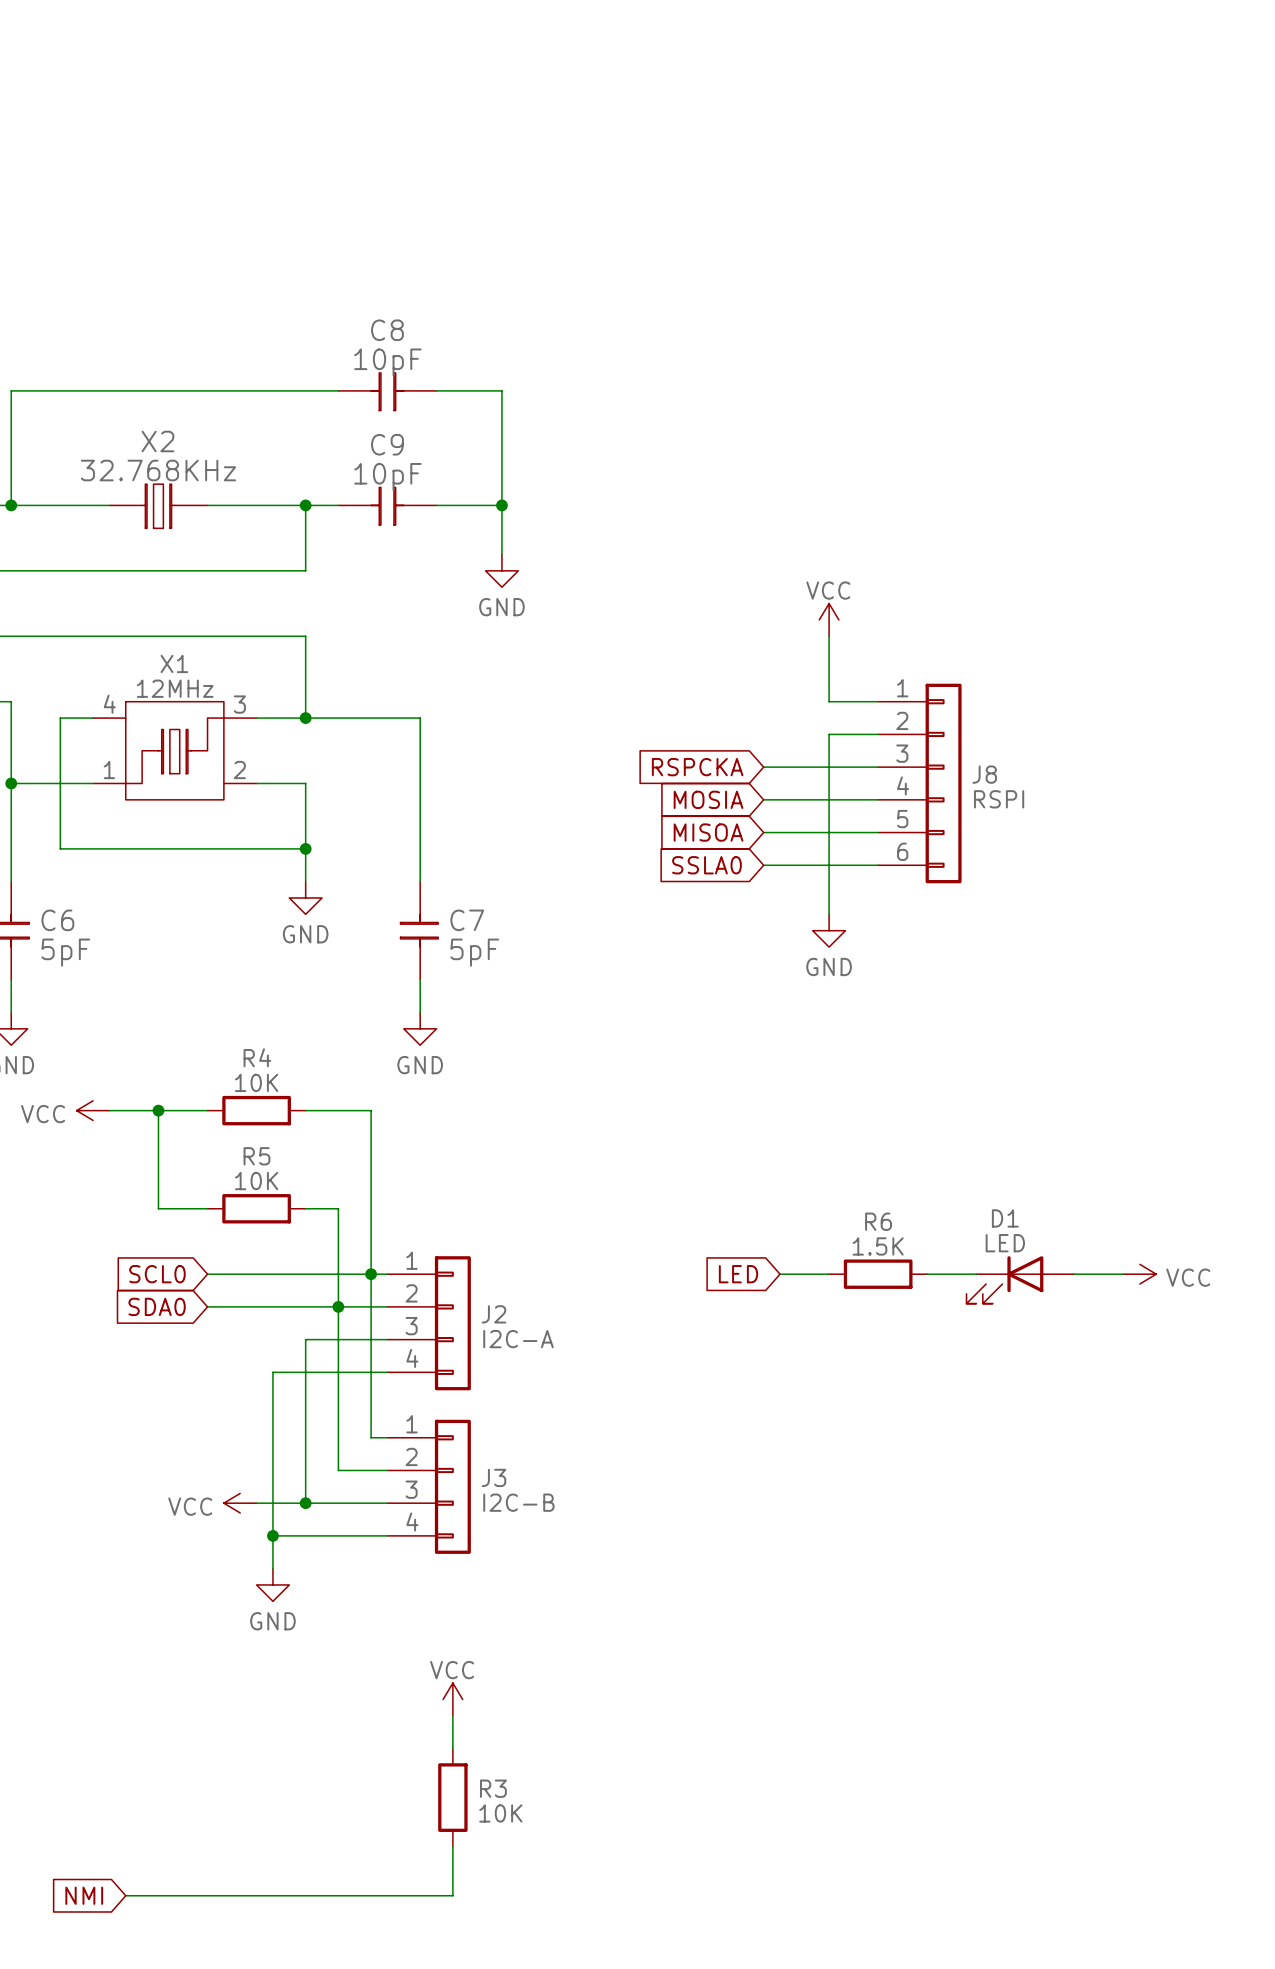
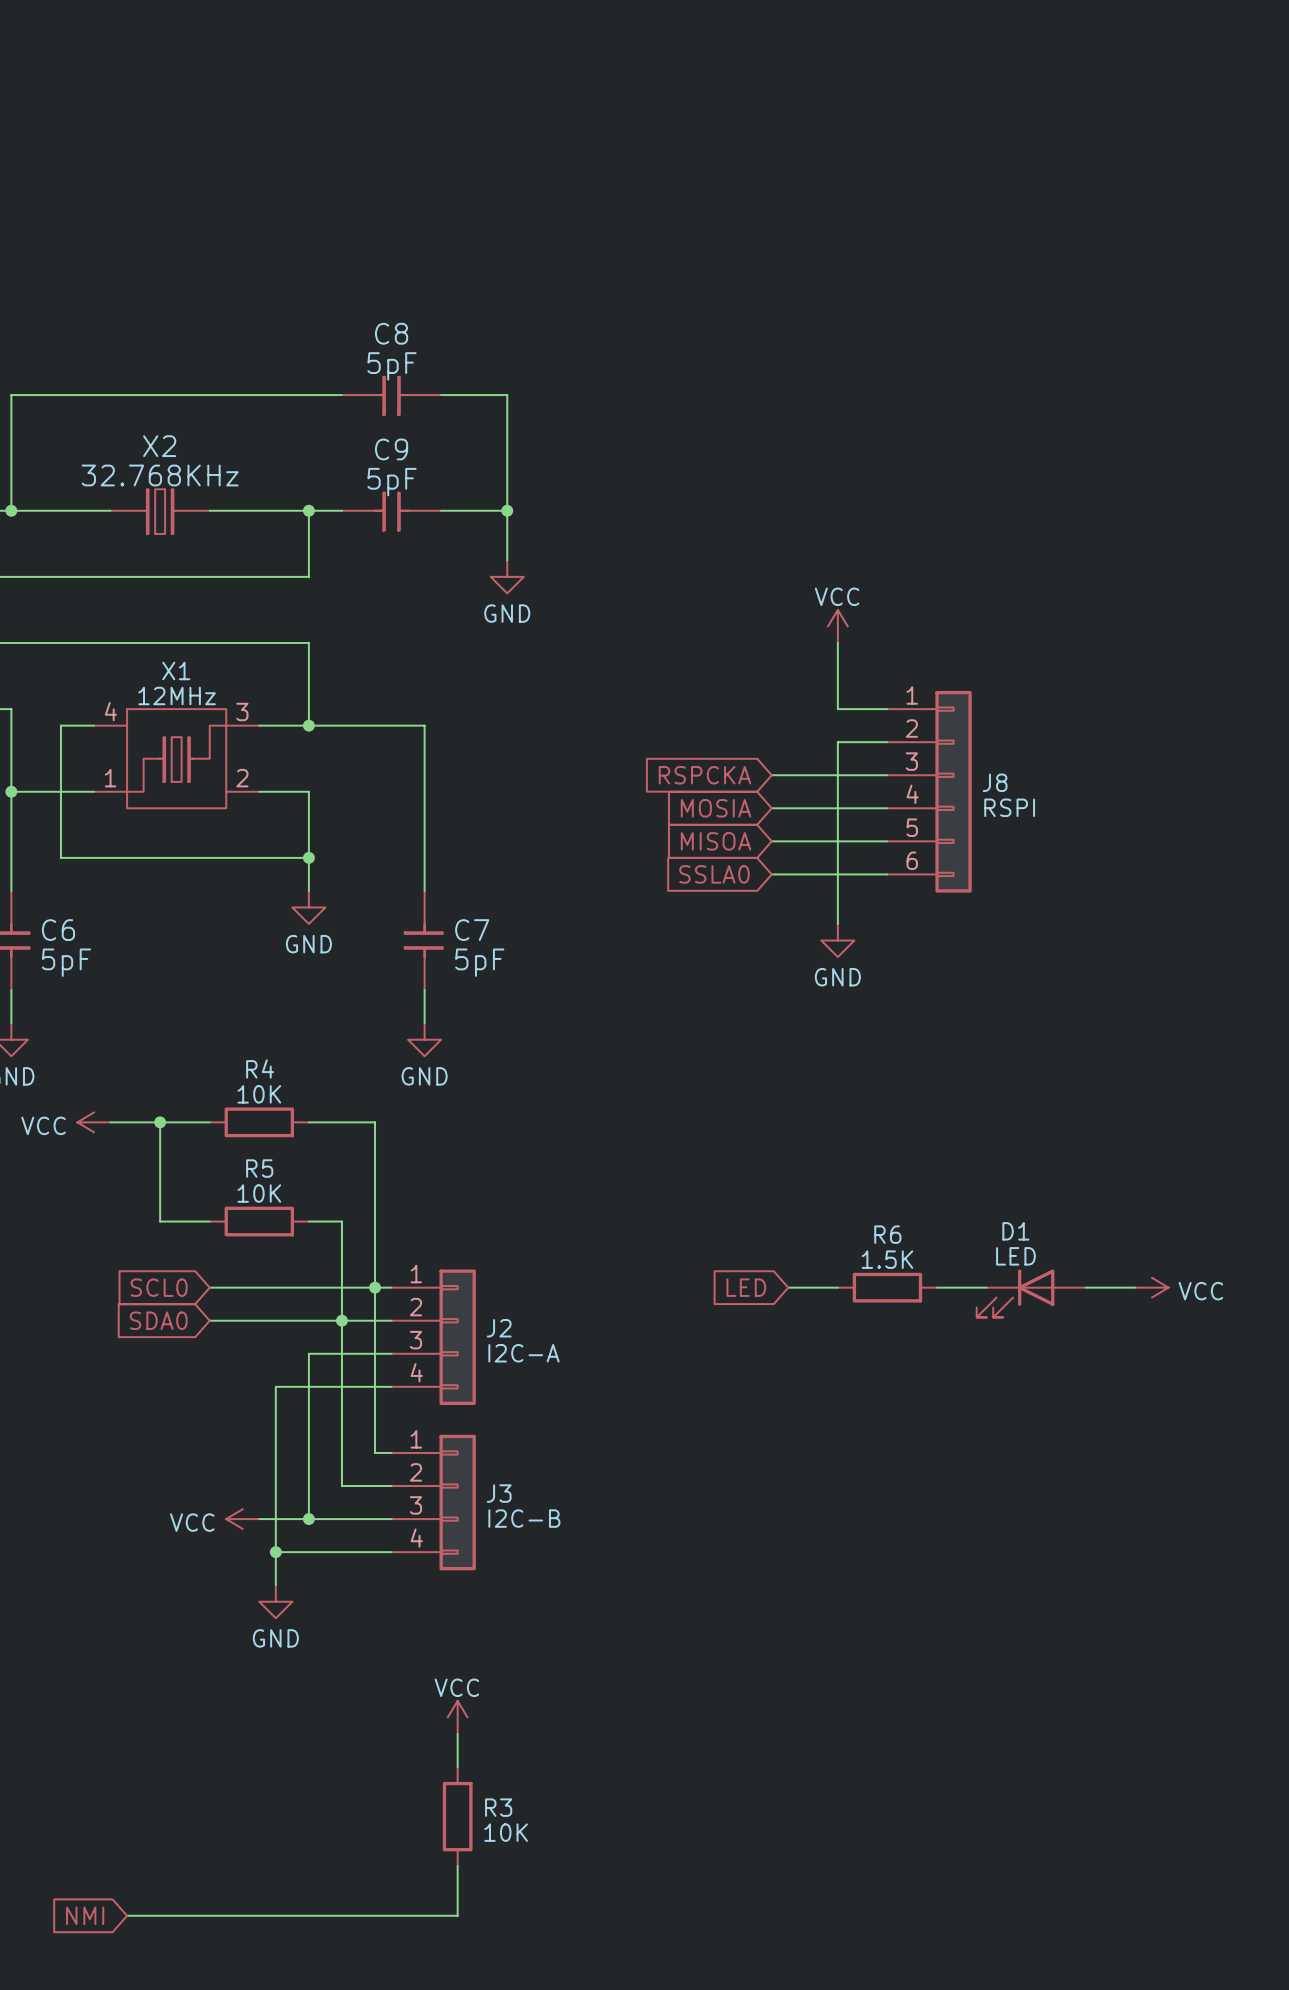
C8 value: 10pF (387, 362) -> 5pF (392, 366)
C9 value: 10pF (387, 477) -> 5pF (392, 482)

